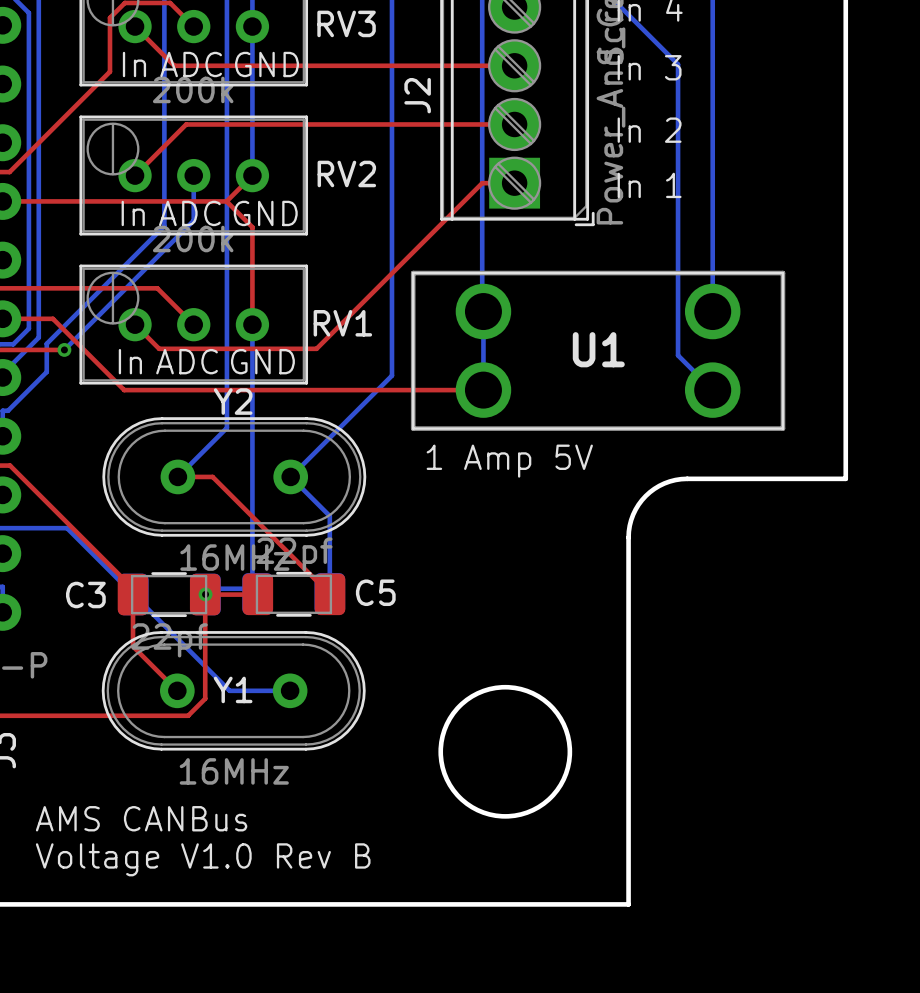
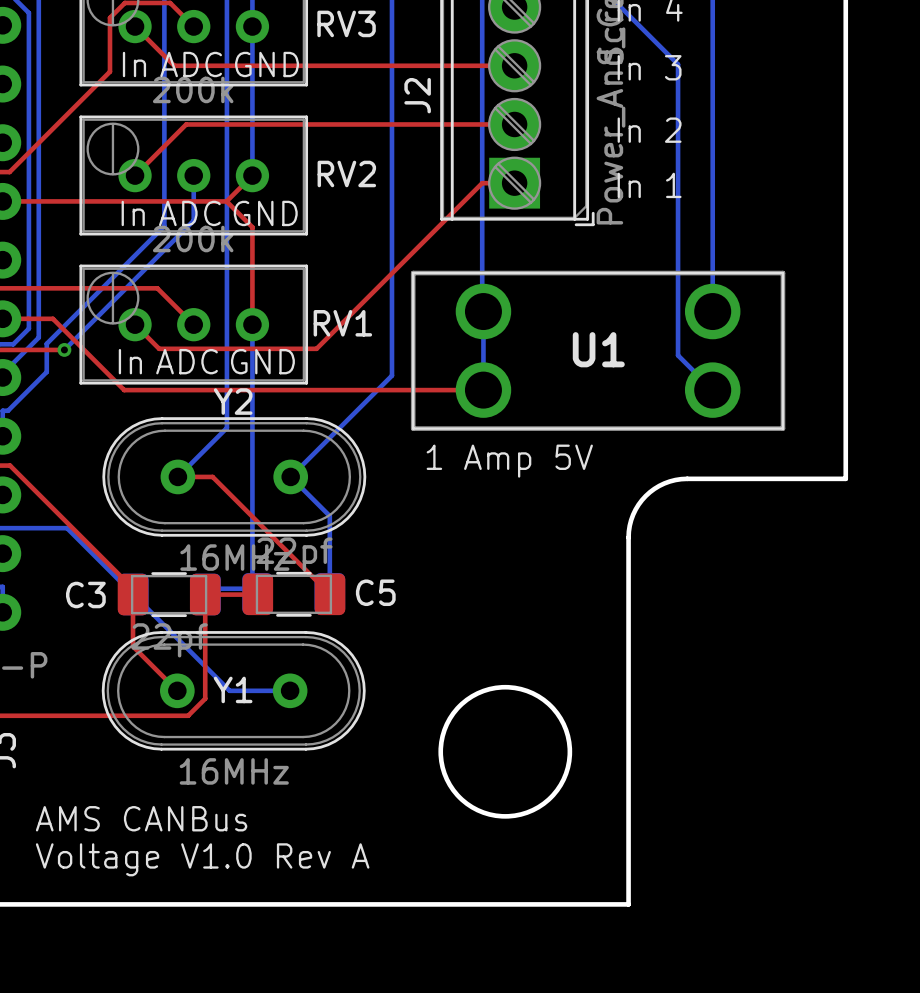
via: (205, 594) -> none
text: Voltage V1.0 Rev B (203, 859) -> Voltage V1.0 Rev A (202, 859)

